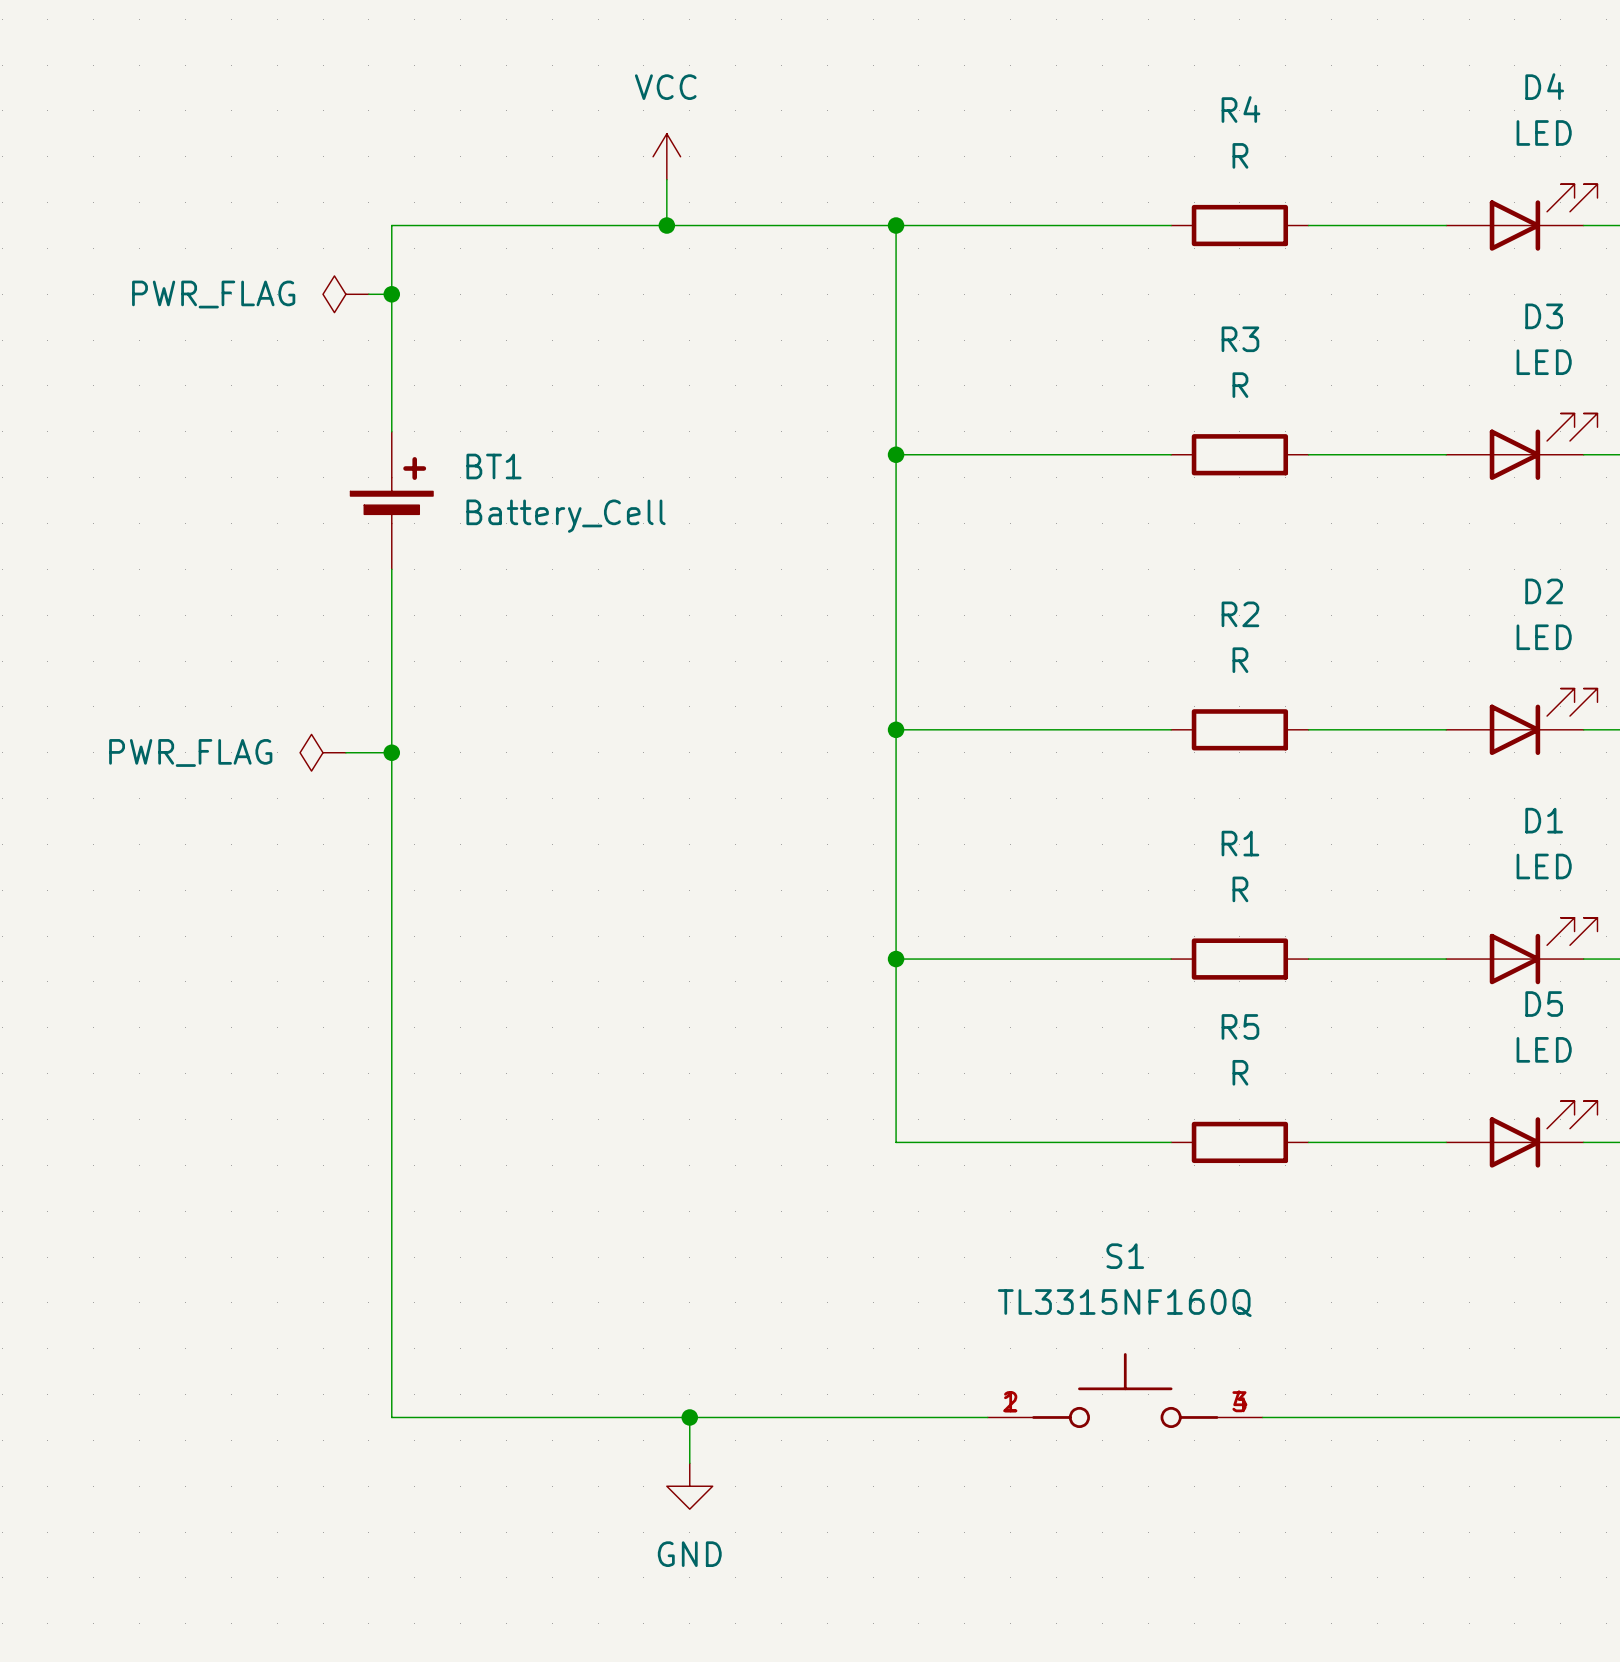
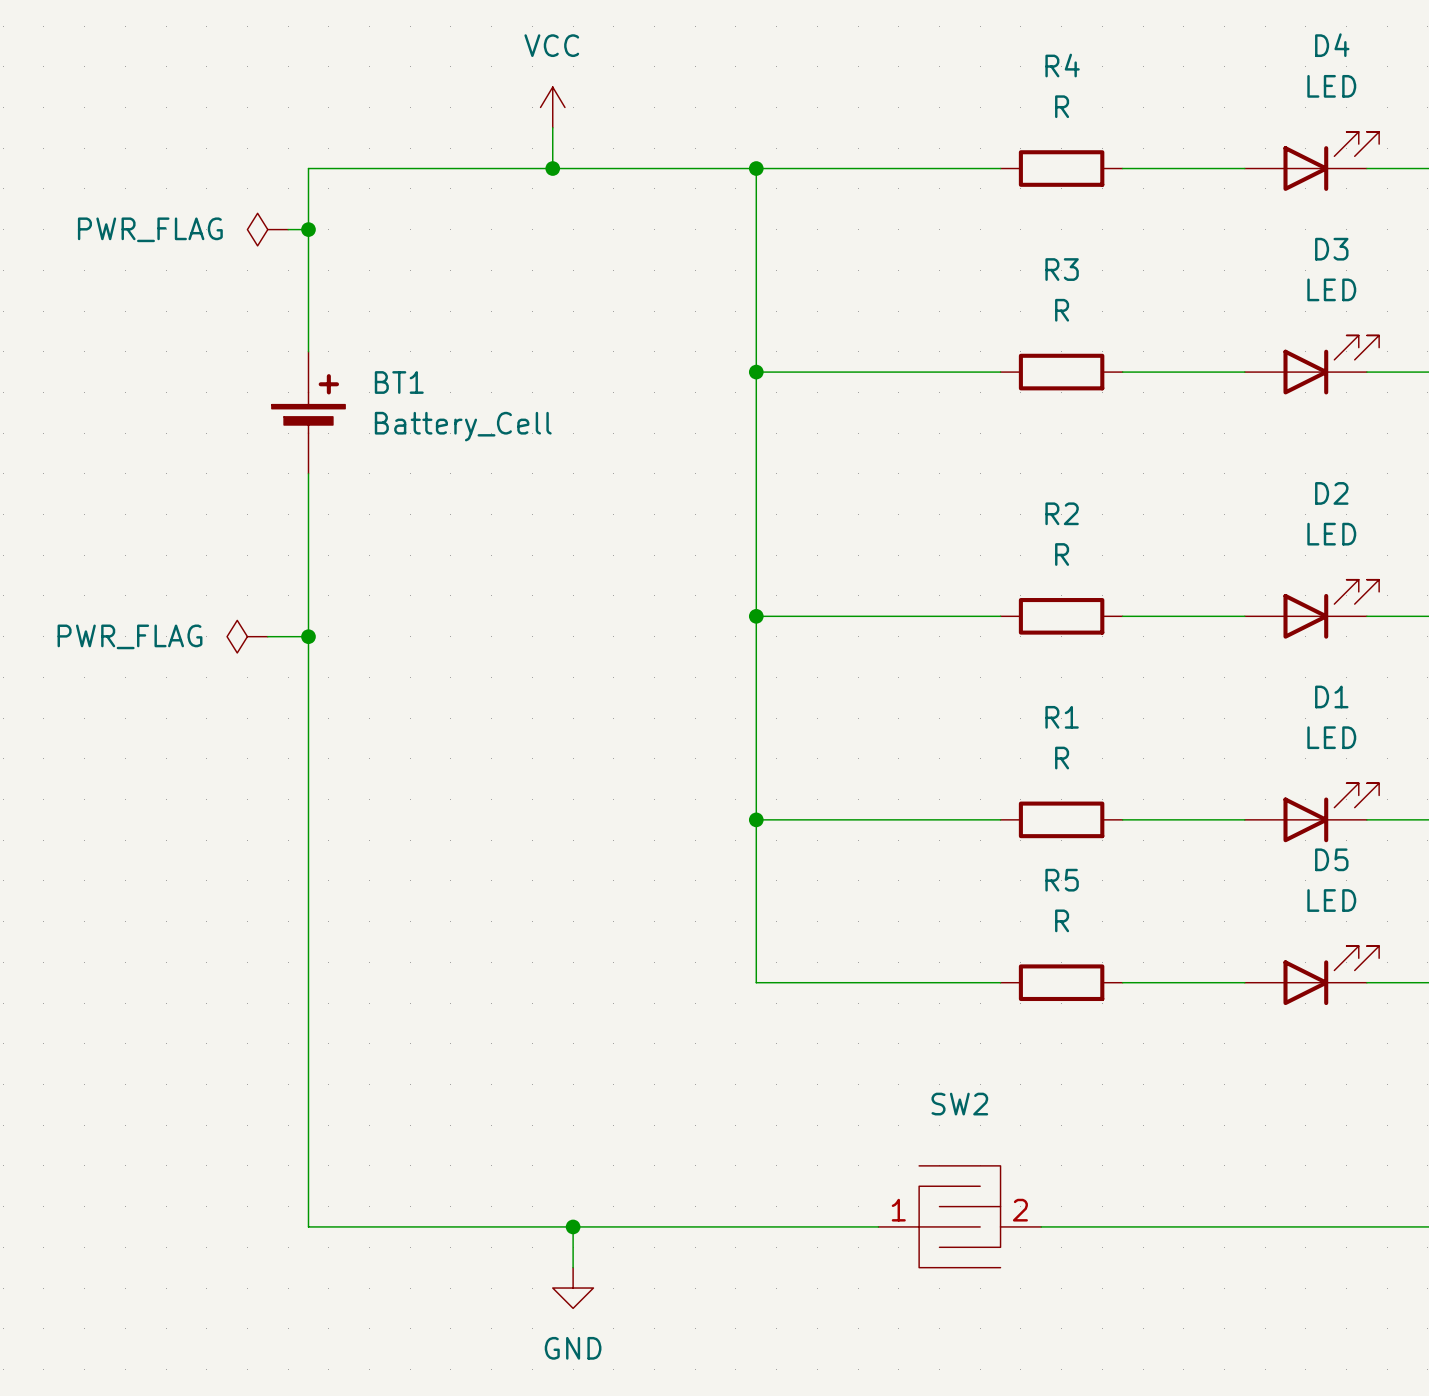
S1: TL3315NF160Q (1125, 1390) -> none
SW2: none -> (959, 1216)

